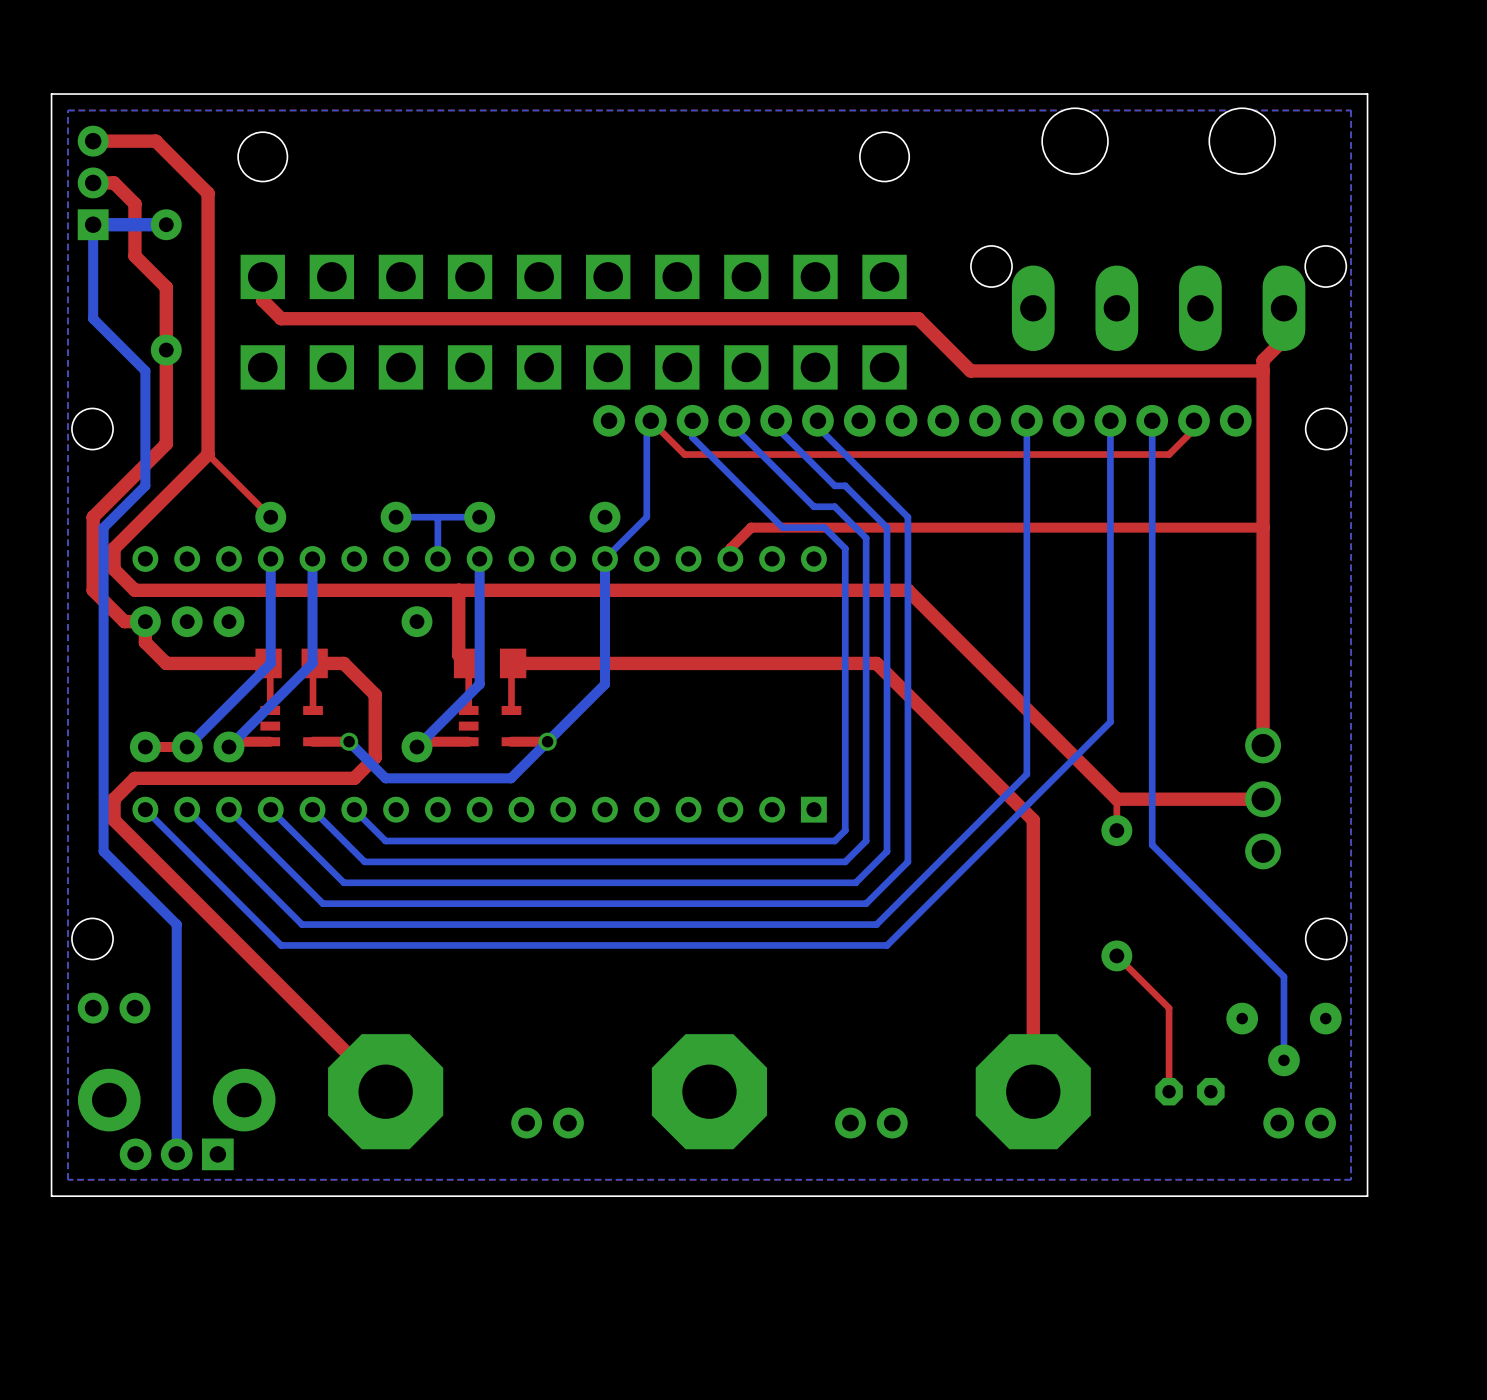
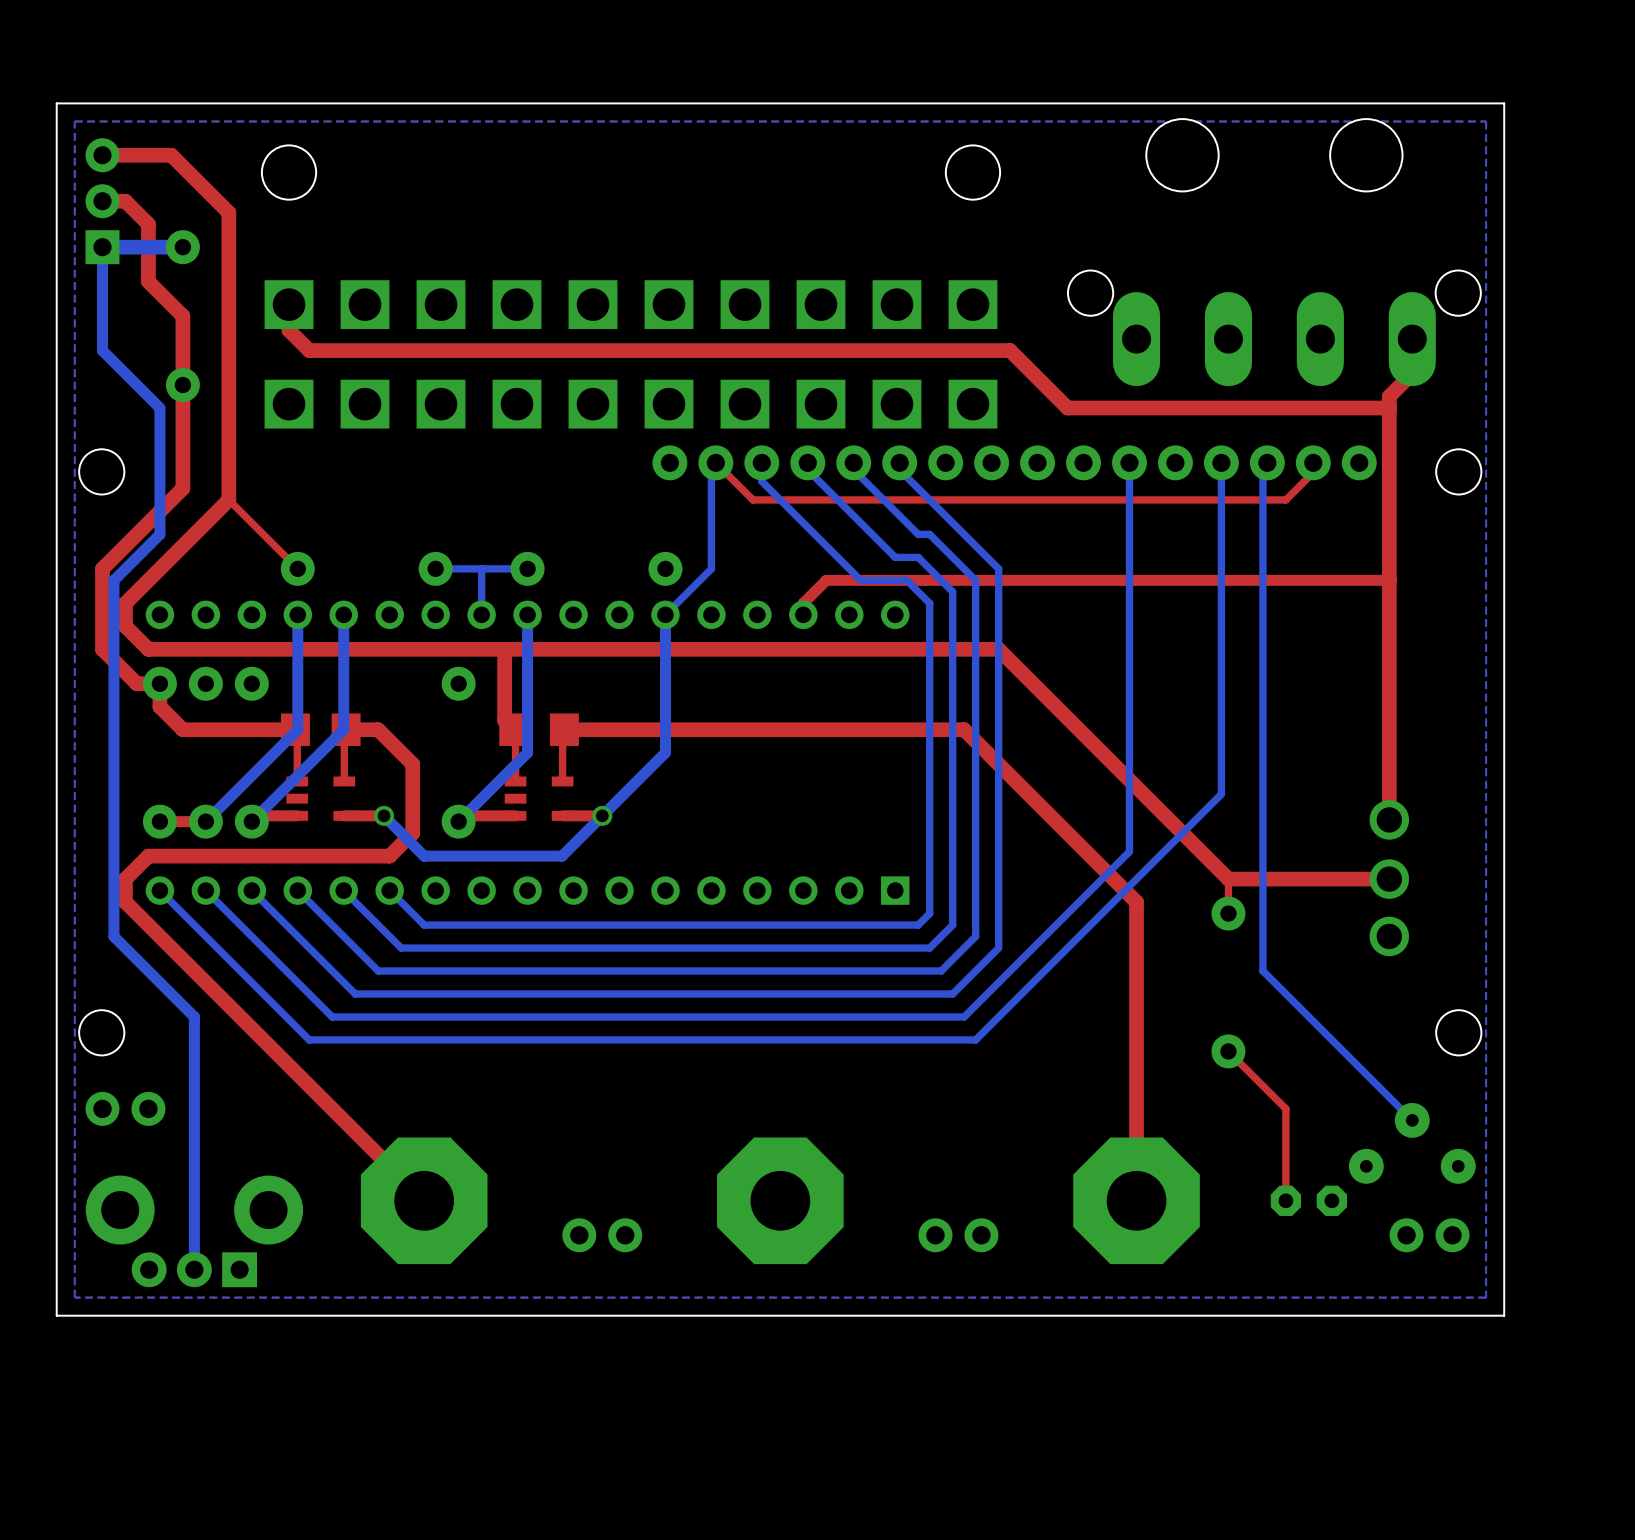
bottom track: (1152, 420) (1152, 845) (1283, 976) (1283, 1060) -> (1267, 462) (1262, 467) (1262, 971) (1412, 1120)
part rotation: 0° (1283, 1039) -> 180° (1412, 1143)

